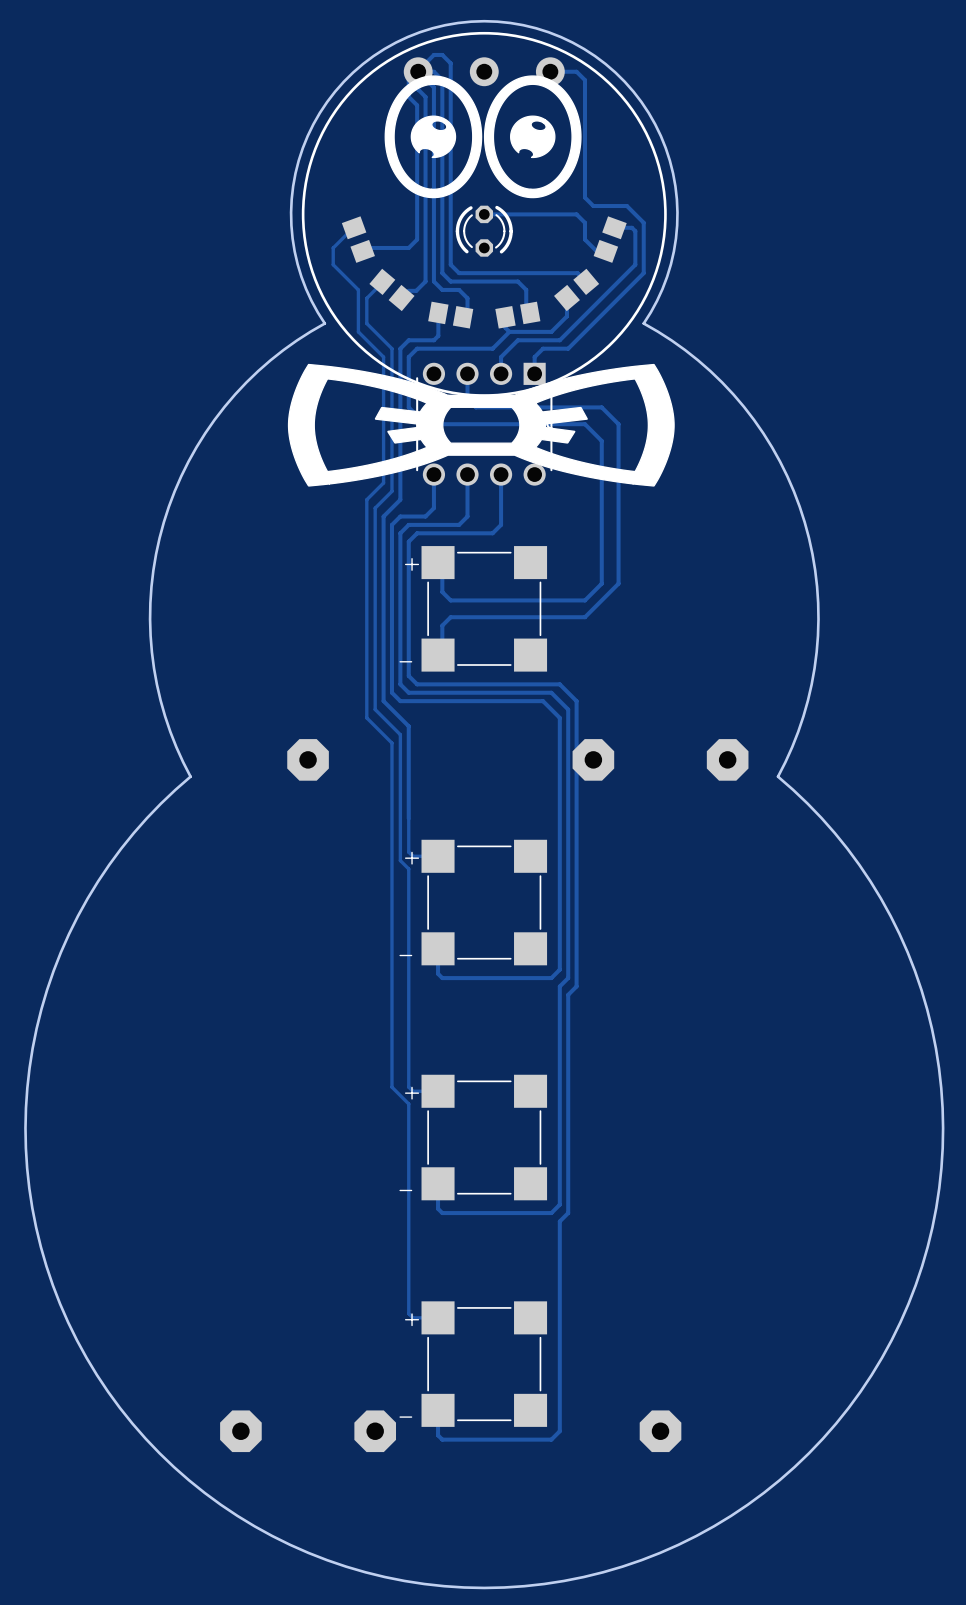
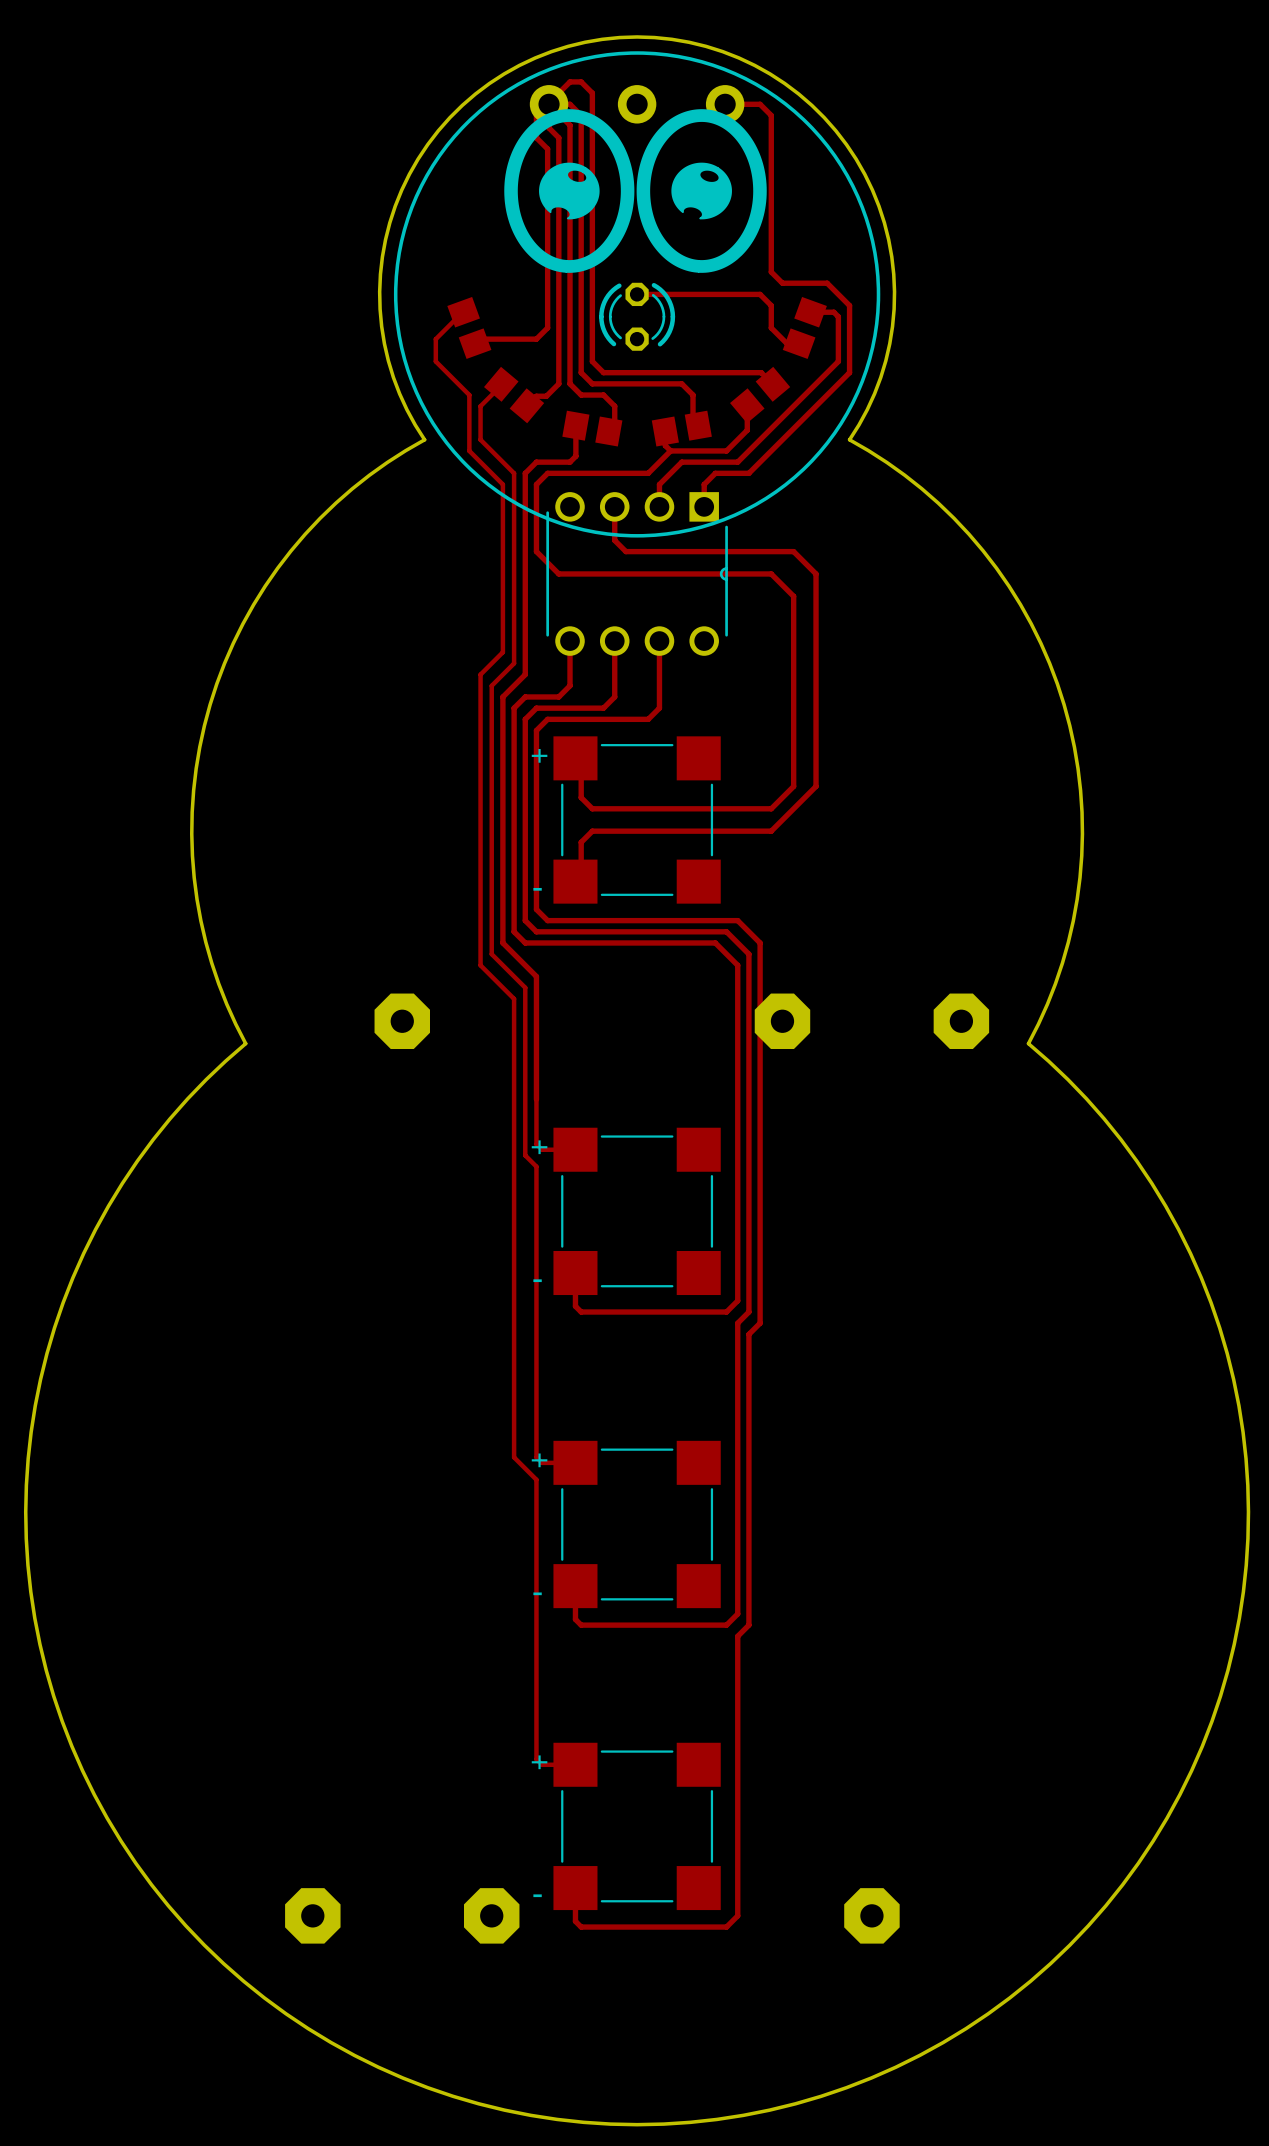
drawing: [287, 363, 675, 487] -> none

